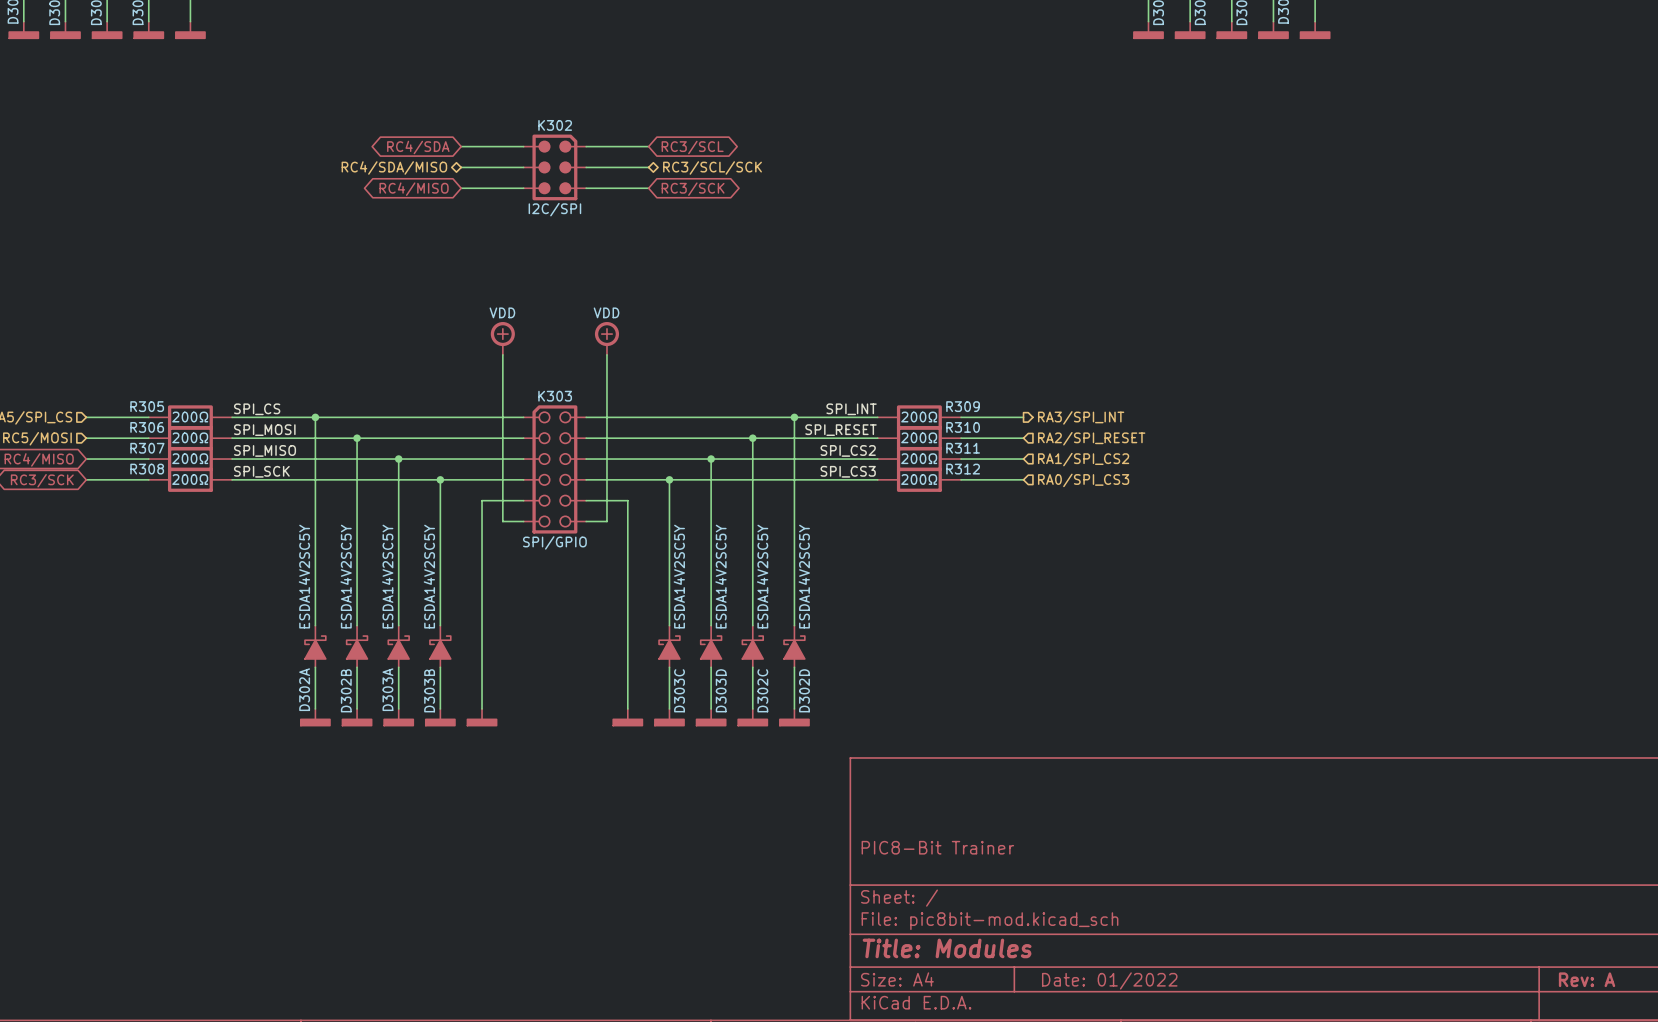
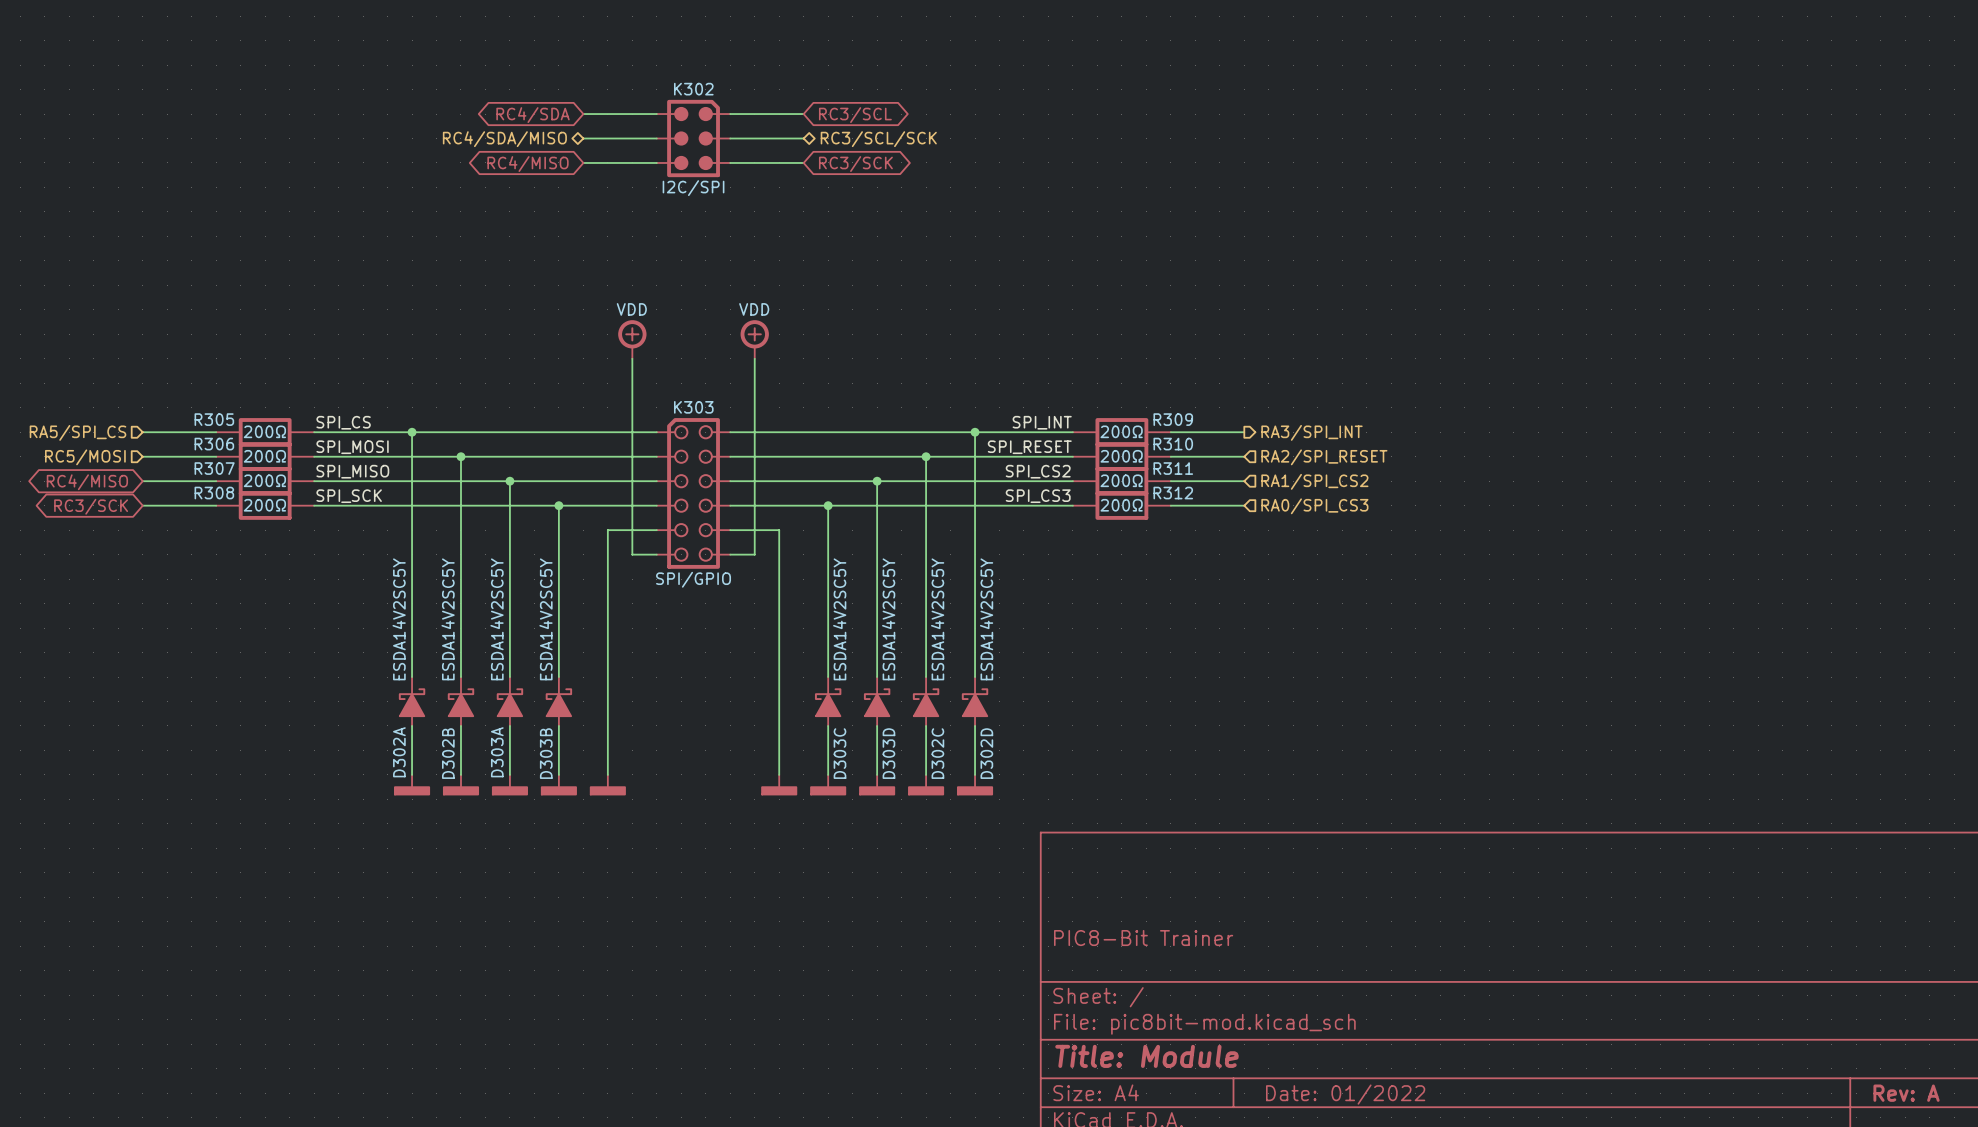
title block: Title: Modules (947, 948) -> Title: Module (1147, 1056)

